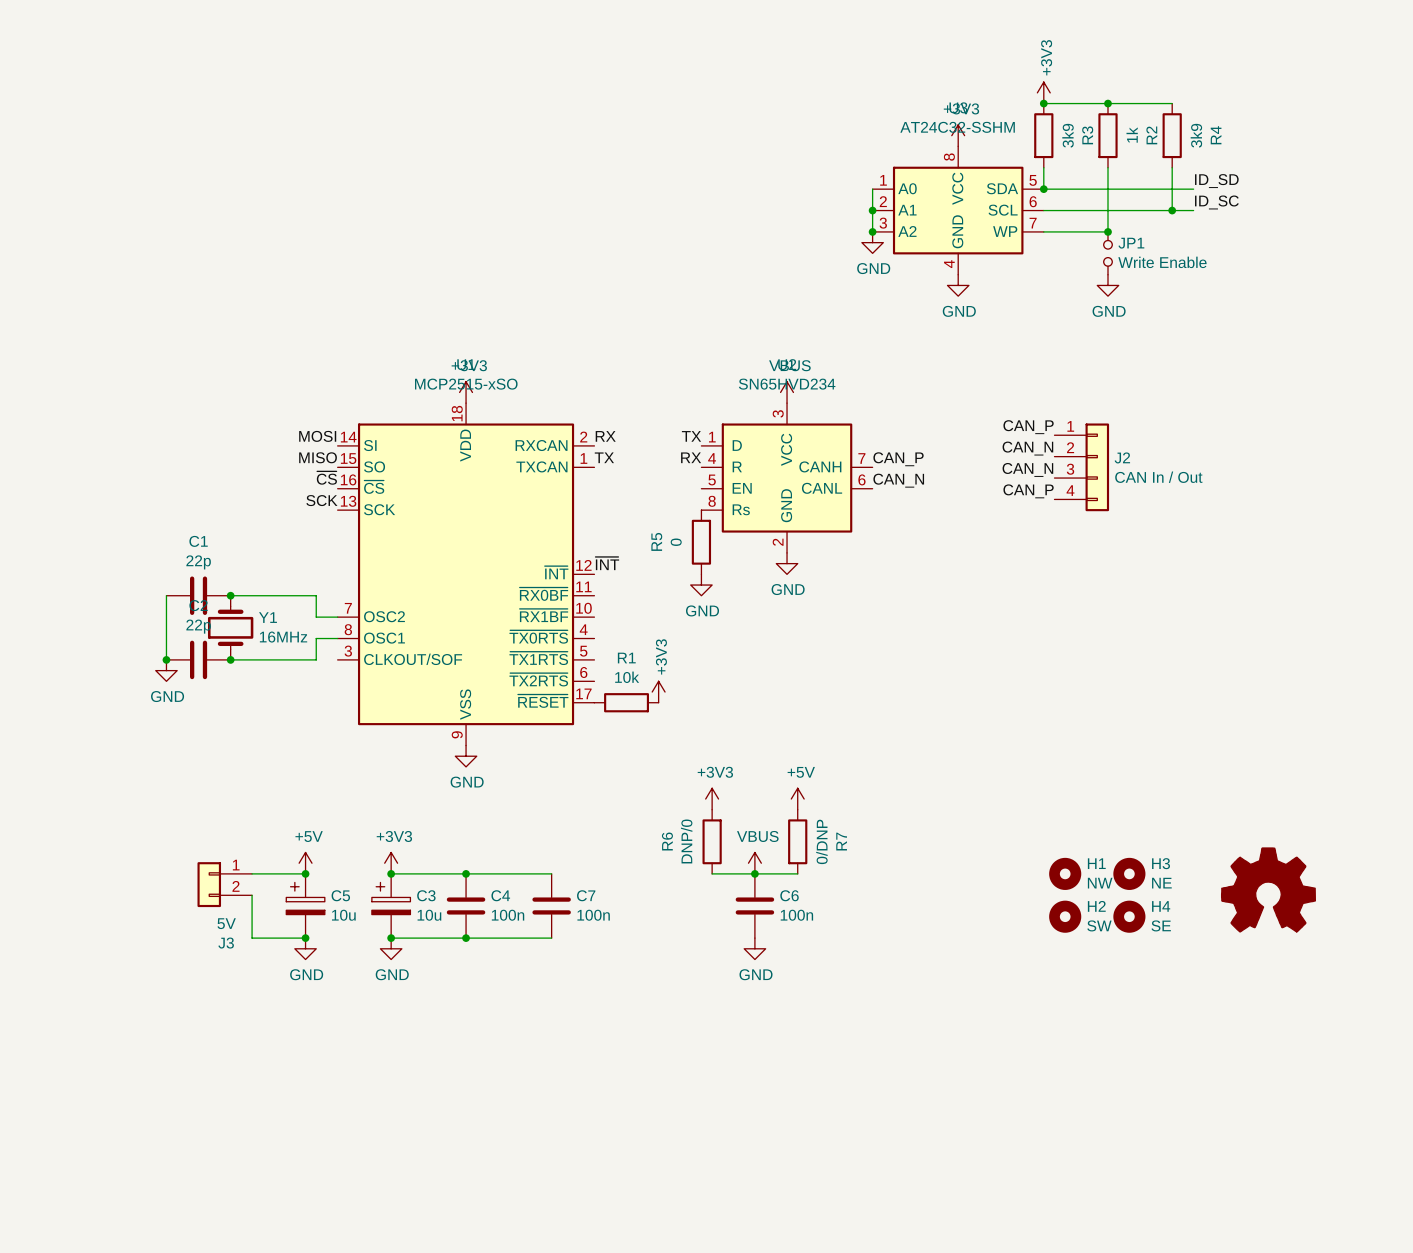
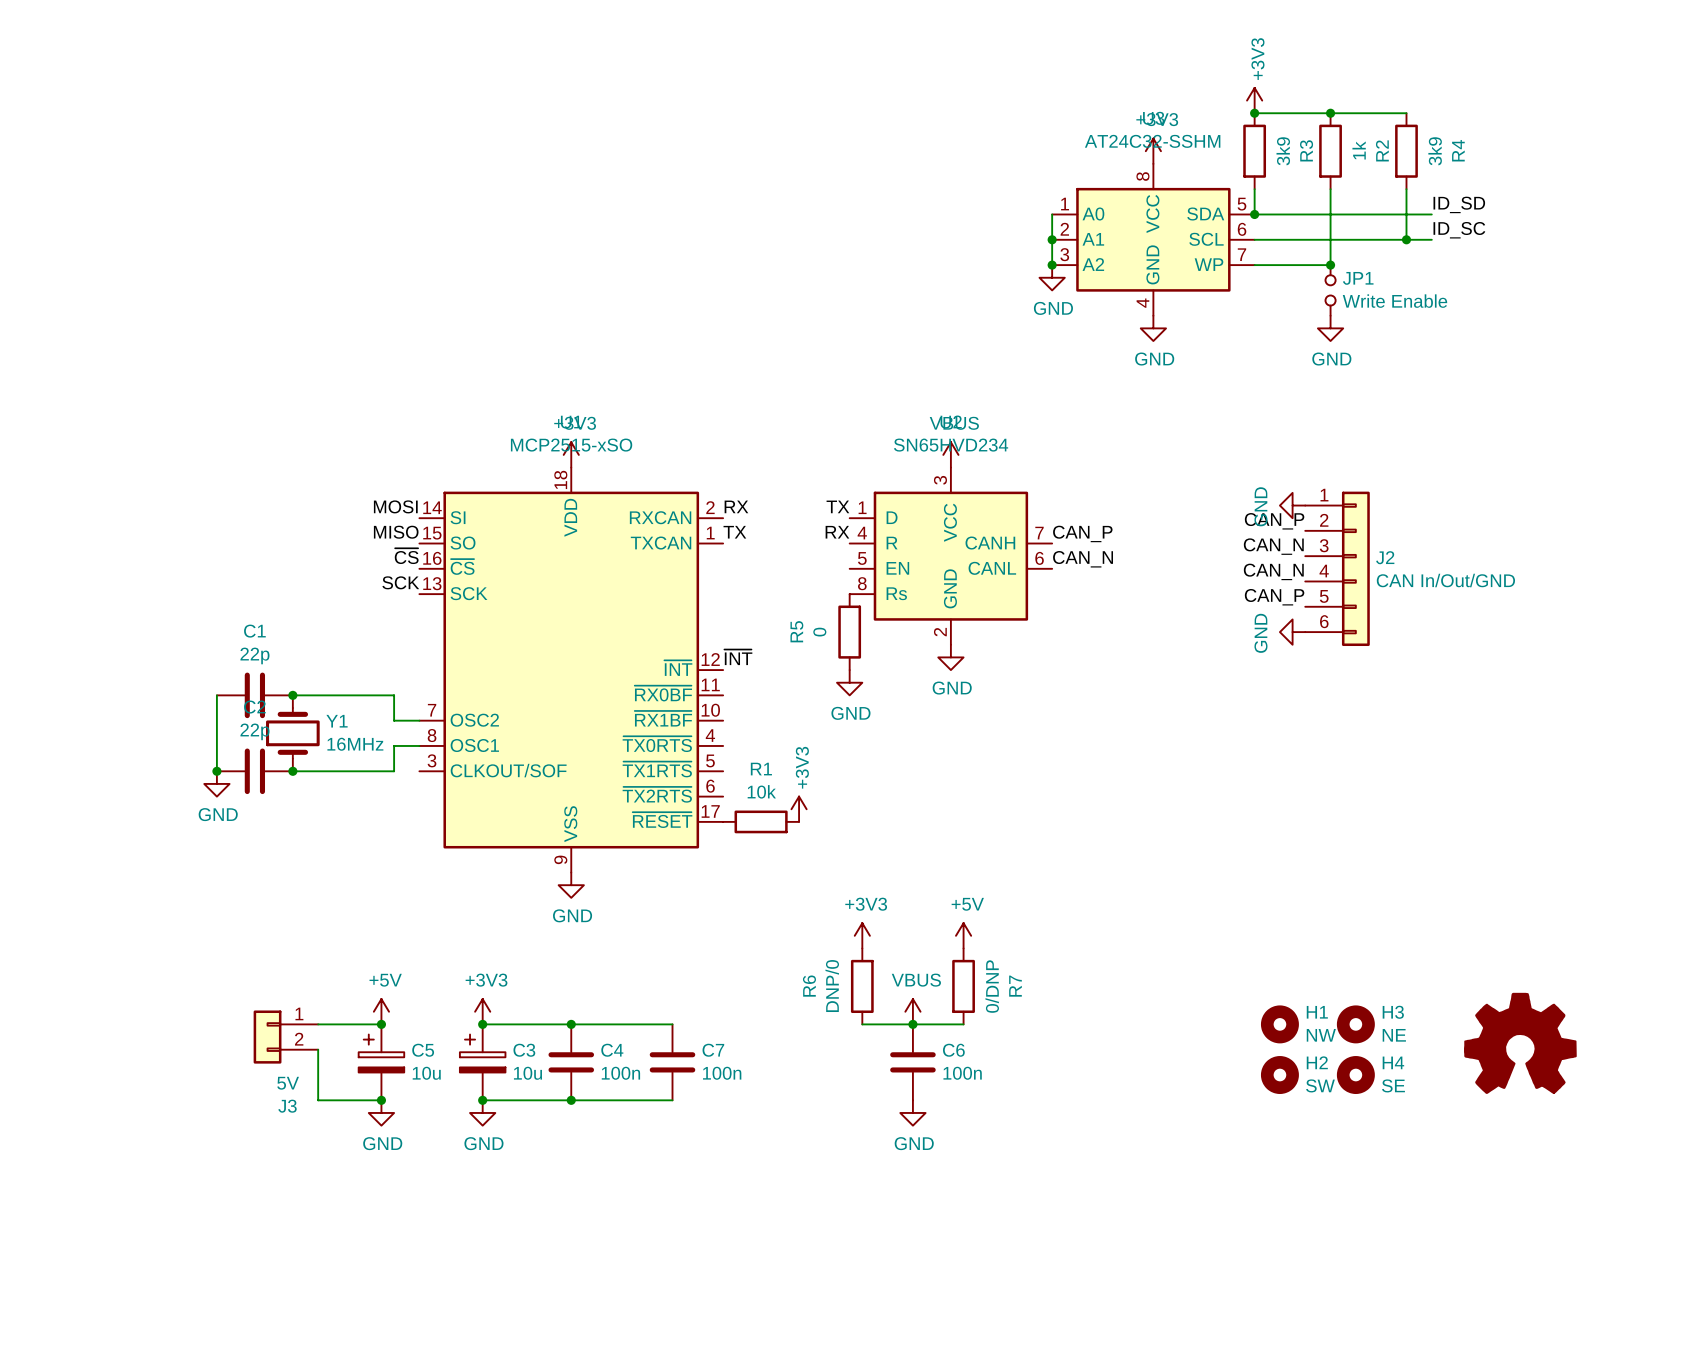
J2 symbol: [1054, 423, 1110, 512] -> [1305, 491, 1370, 647]
label: CAN_P (1028, 427) -> none
power symbol: none -> GND (1292, 505)
label: CAN_N (1027, 448) -> none
label: none -> CAN_P (1274, 521)
label: CAN_N (1027, 469) -> none
label: none -> CAN_N (1273, 546)
J2 value: CAN In / Out (1158, 477) -> CAN In/Out/GND (1445, 580)
label: CAN_P (1028, 491) -> none
label: none -> CAN_N (1273, 571)
label: none -> CAN_P (1274, 597)
power symbol: none -> GND (1292, 632)

